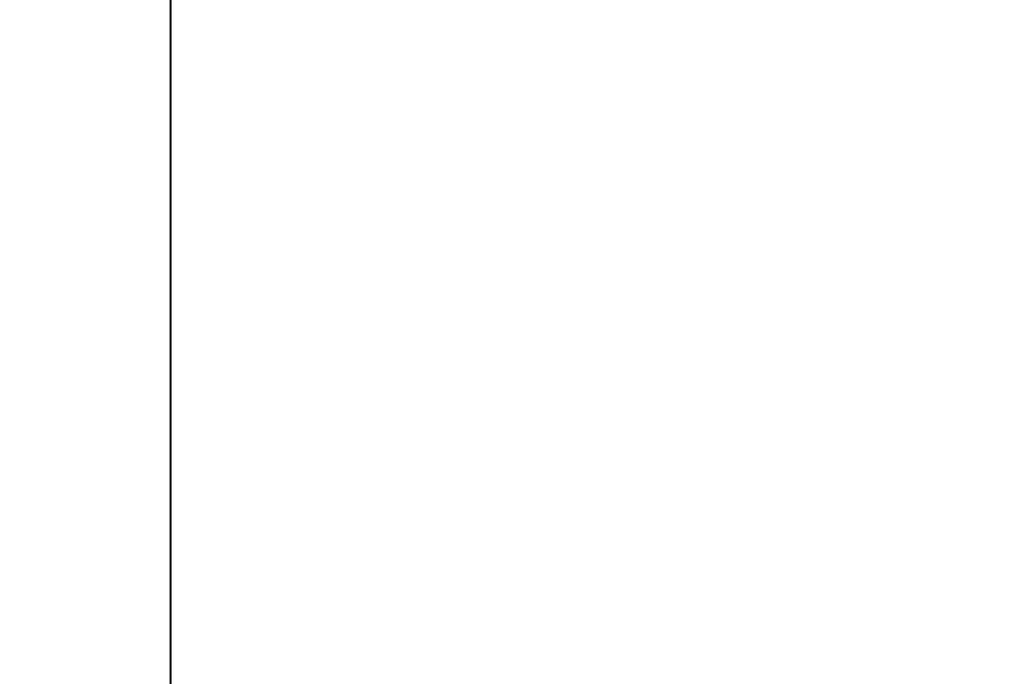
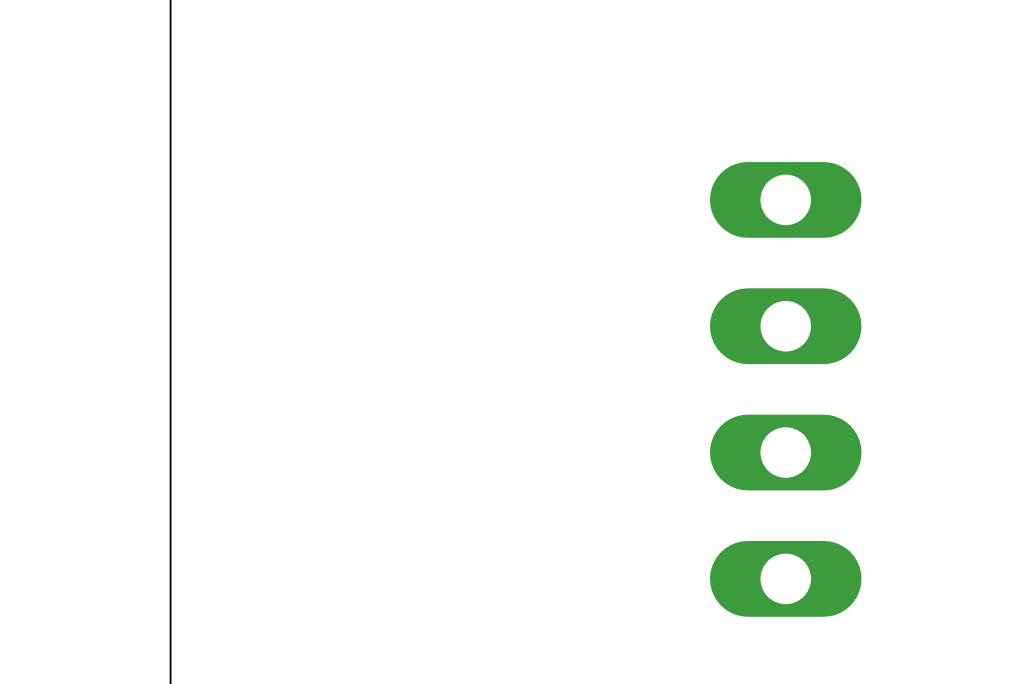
part: none -> (785, 389)

